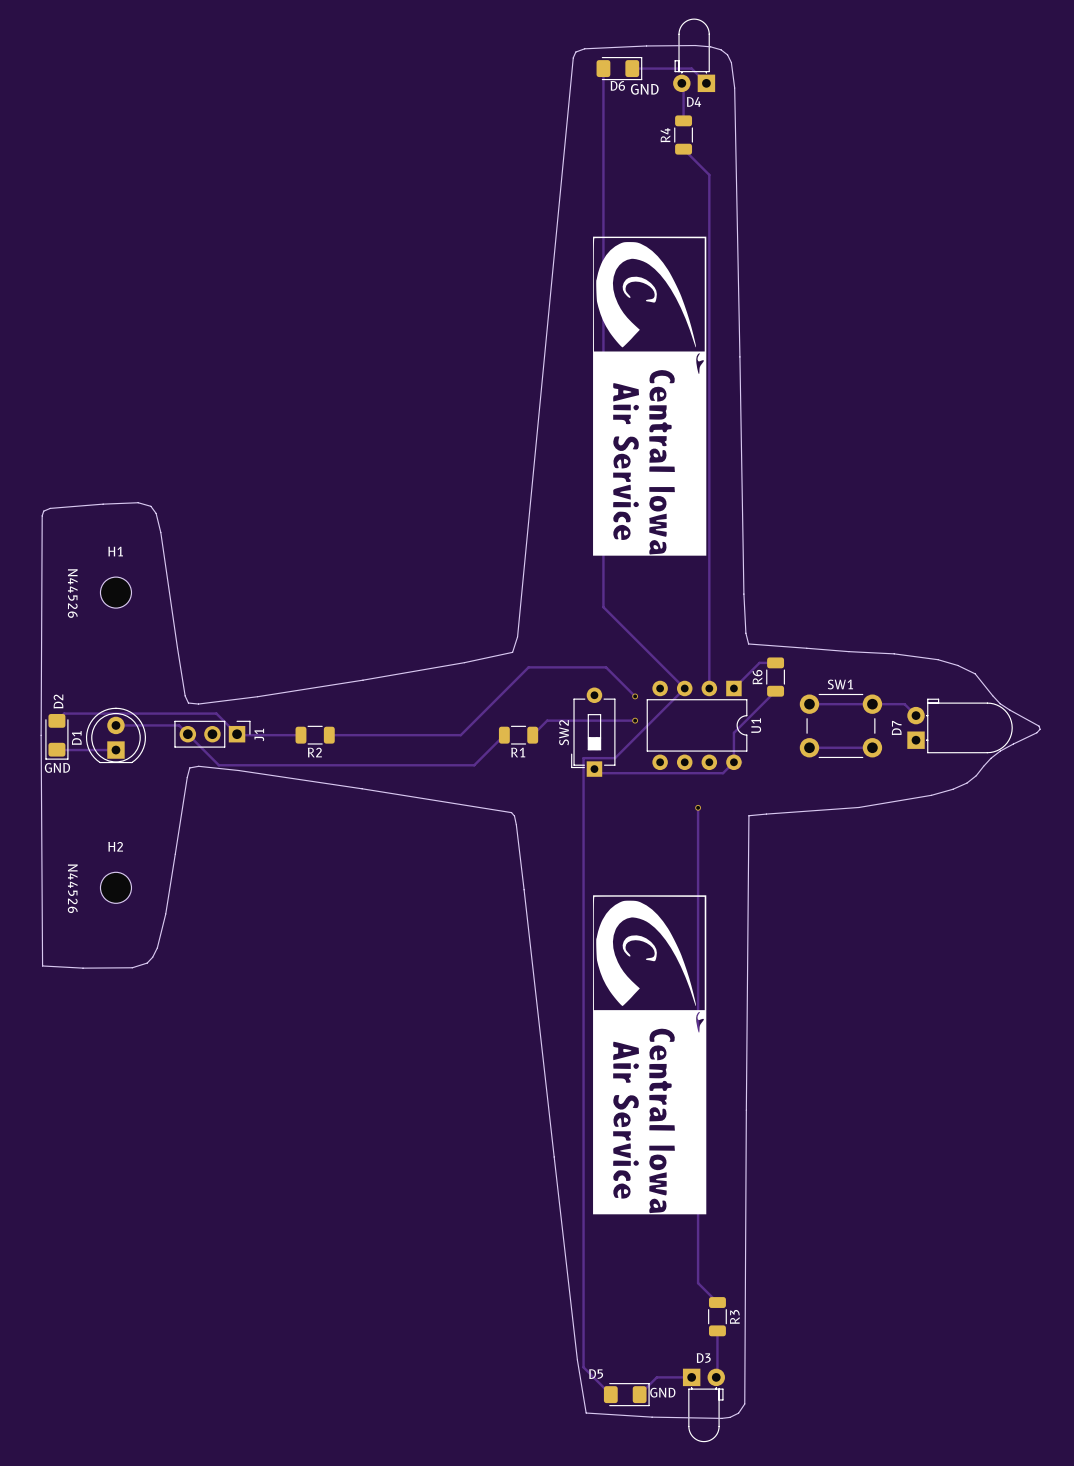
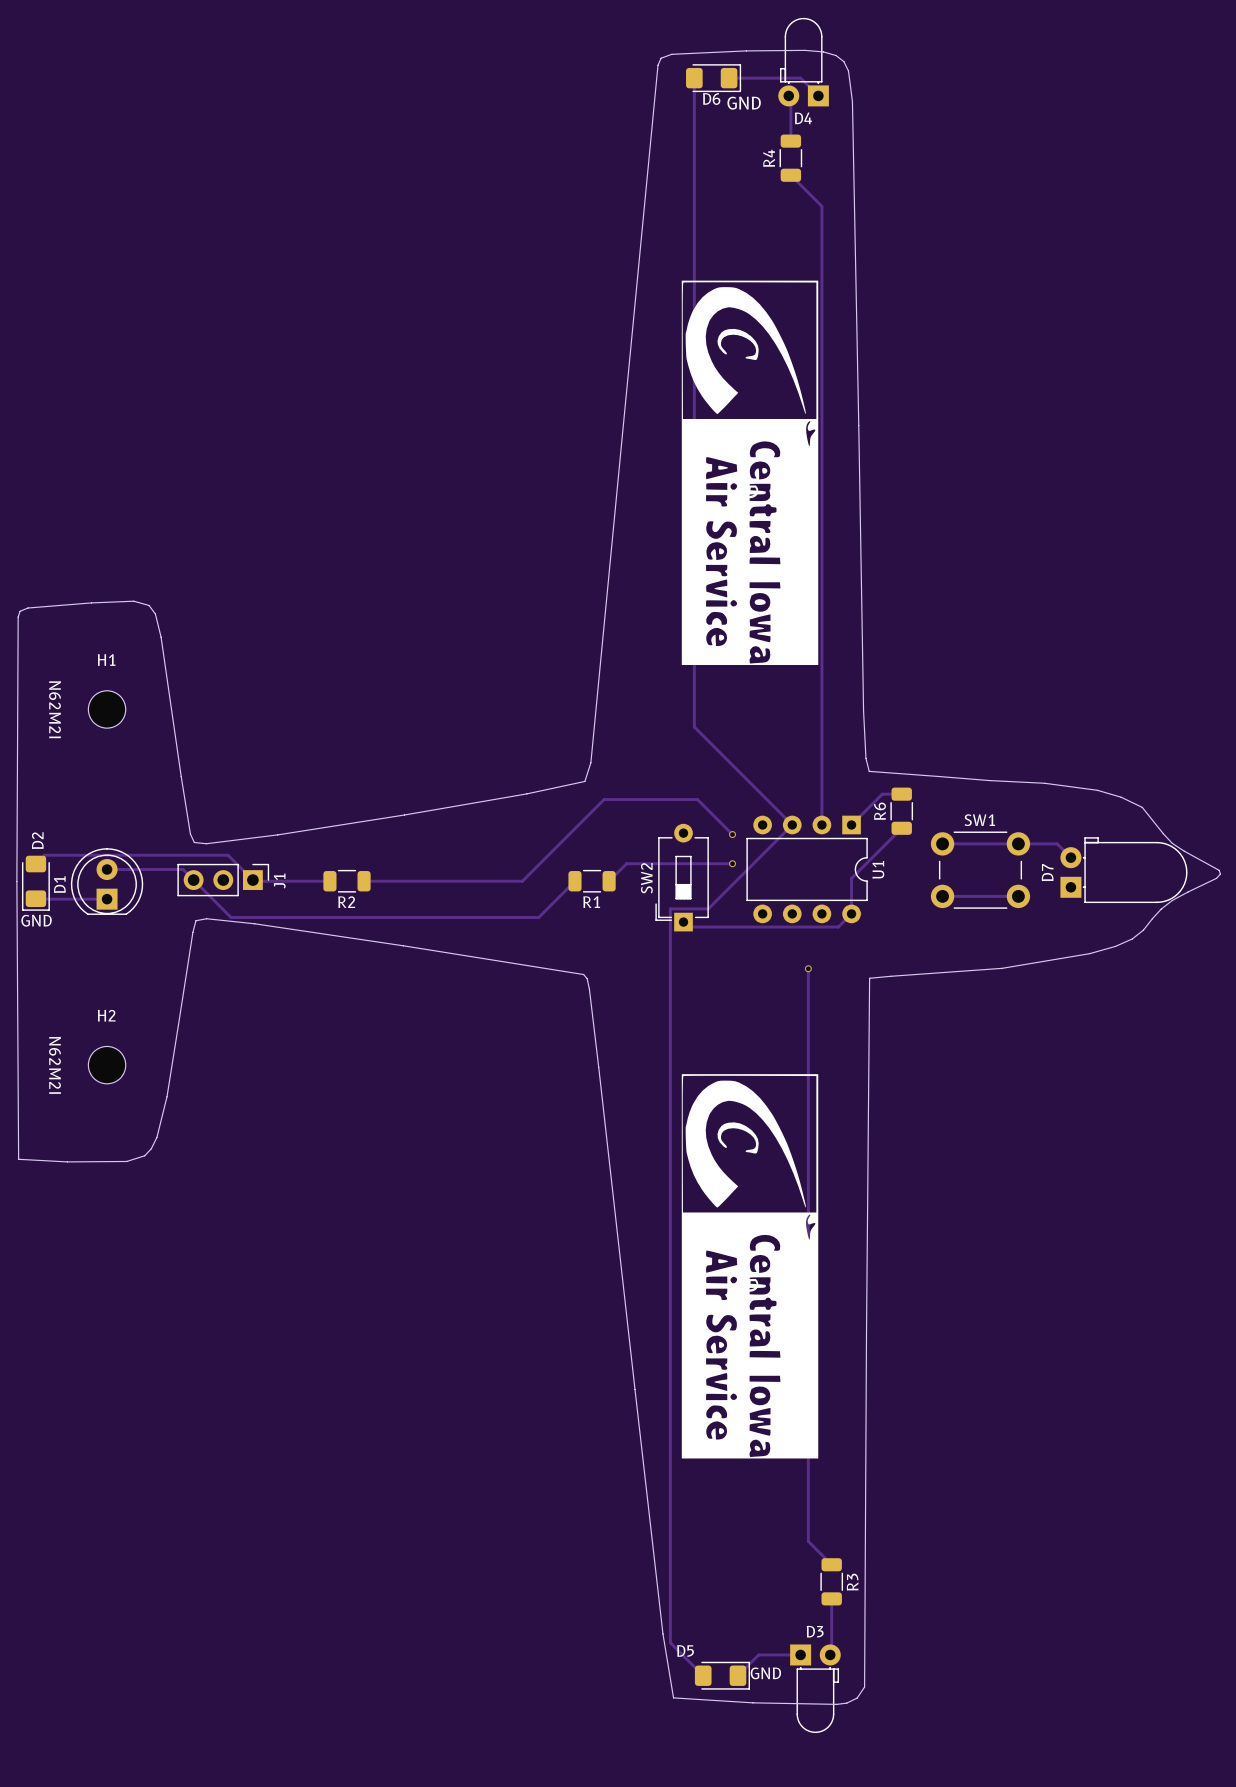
drawing: [593, 236, 707, 556] -> none
part: none -> (750, 472)
text: N44526 (72, 593) -> N62M2I (54, 709)
text: N44526 (72, 888) -> N62M2I (54, 1065)
drawing: [593, 895, 707, 1215] -> none
part: none -> (750, 1266)

